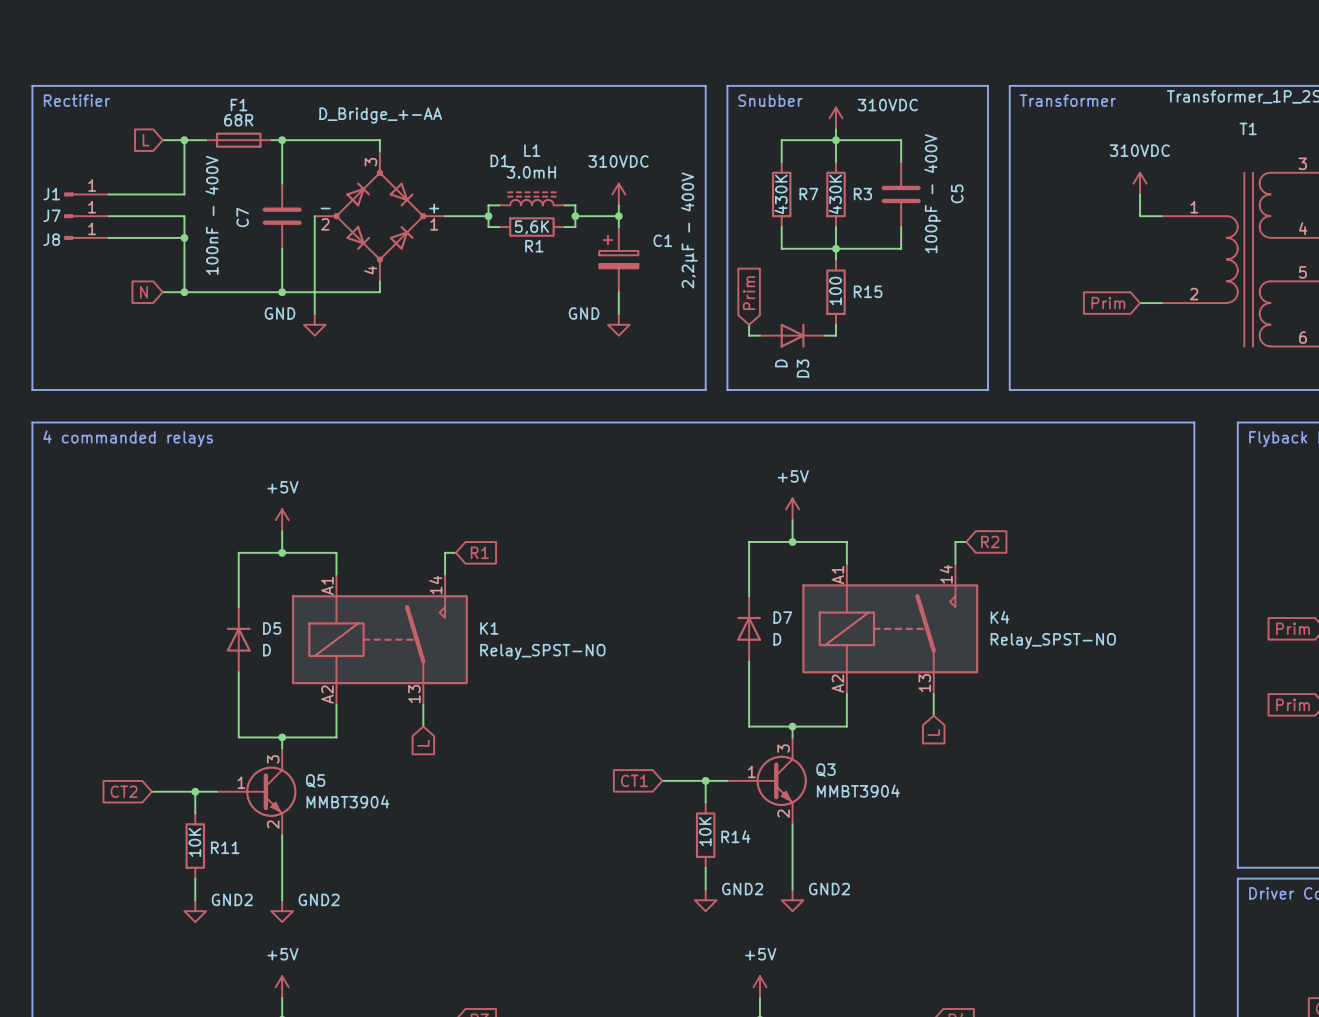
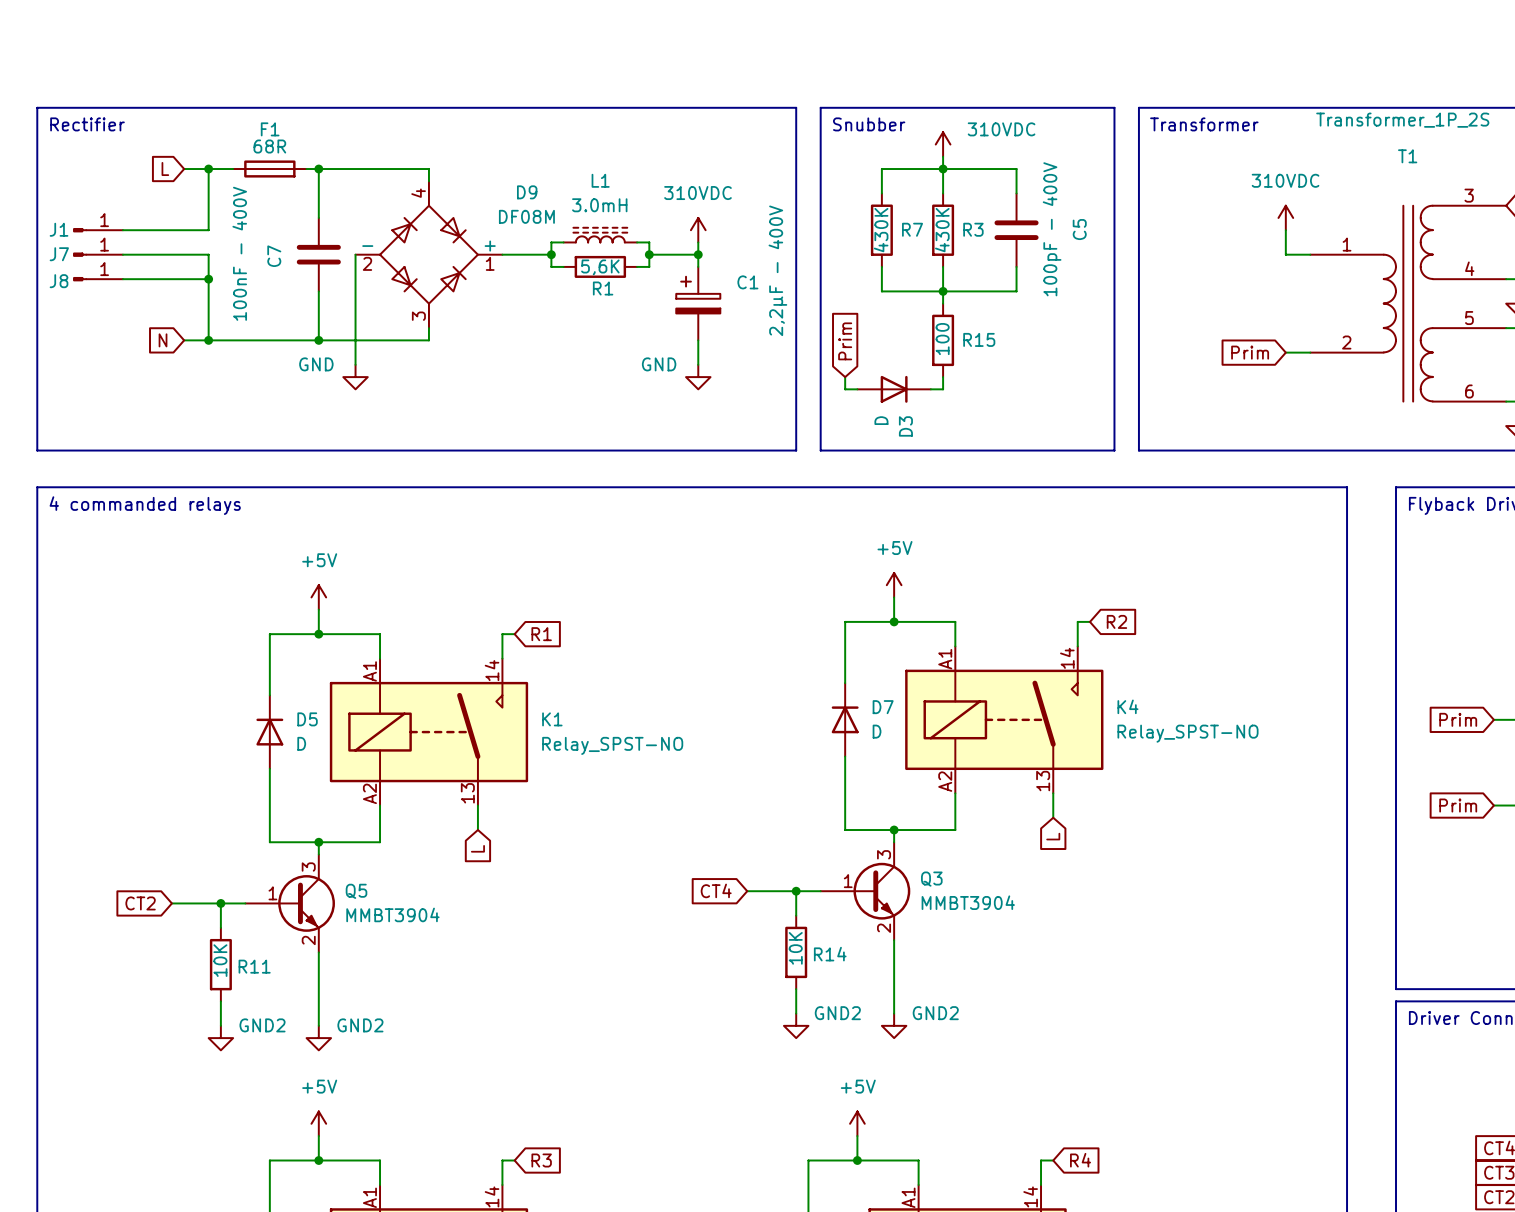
D1: D_Bridge_+-AA (379, 216) -> none
D9: none -> DF08M (428, 254)
global label: CT1 (634, 780) -> CT4 (716, 890)

